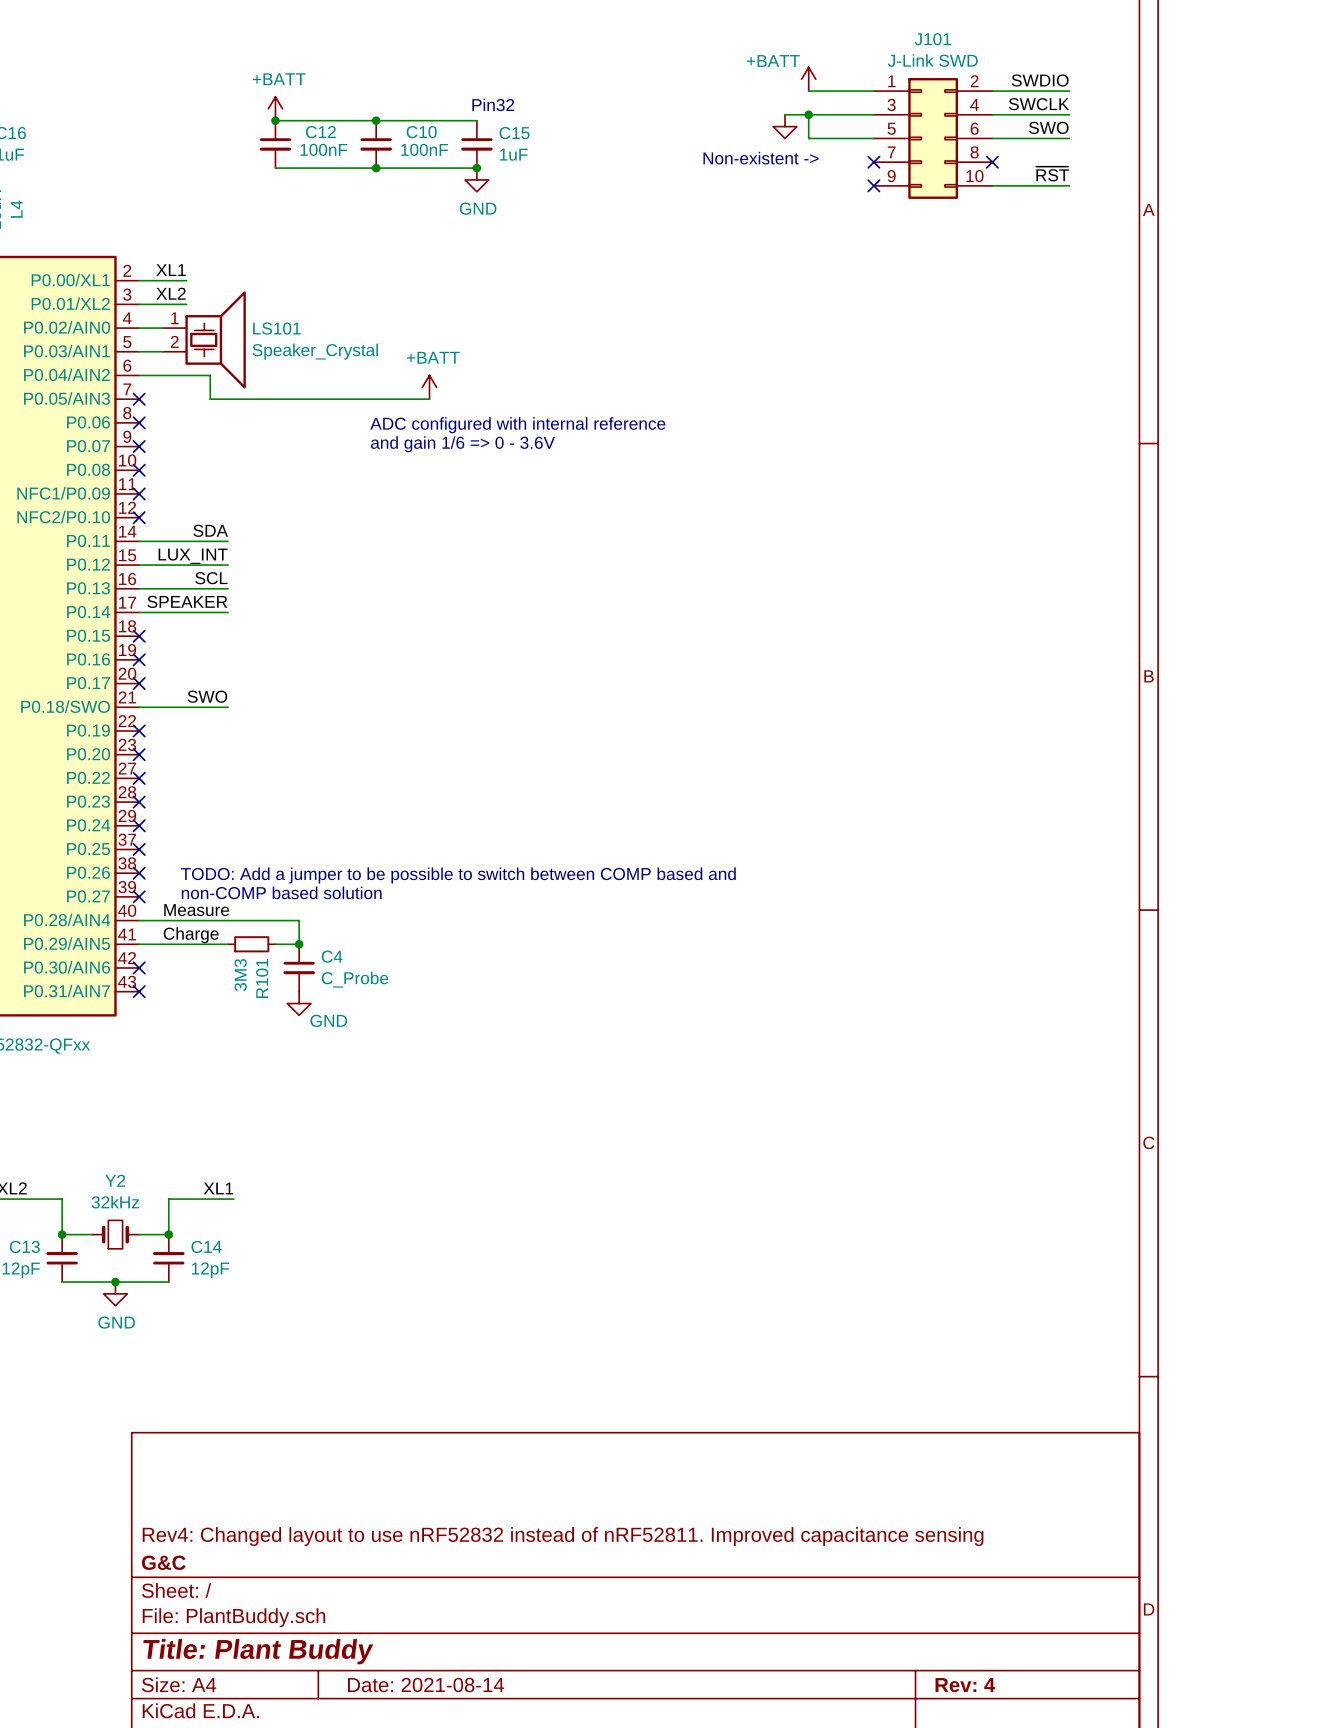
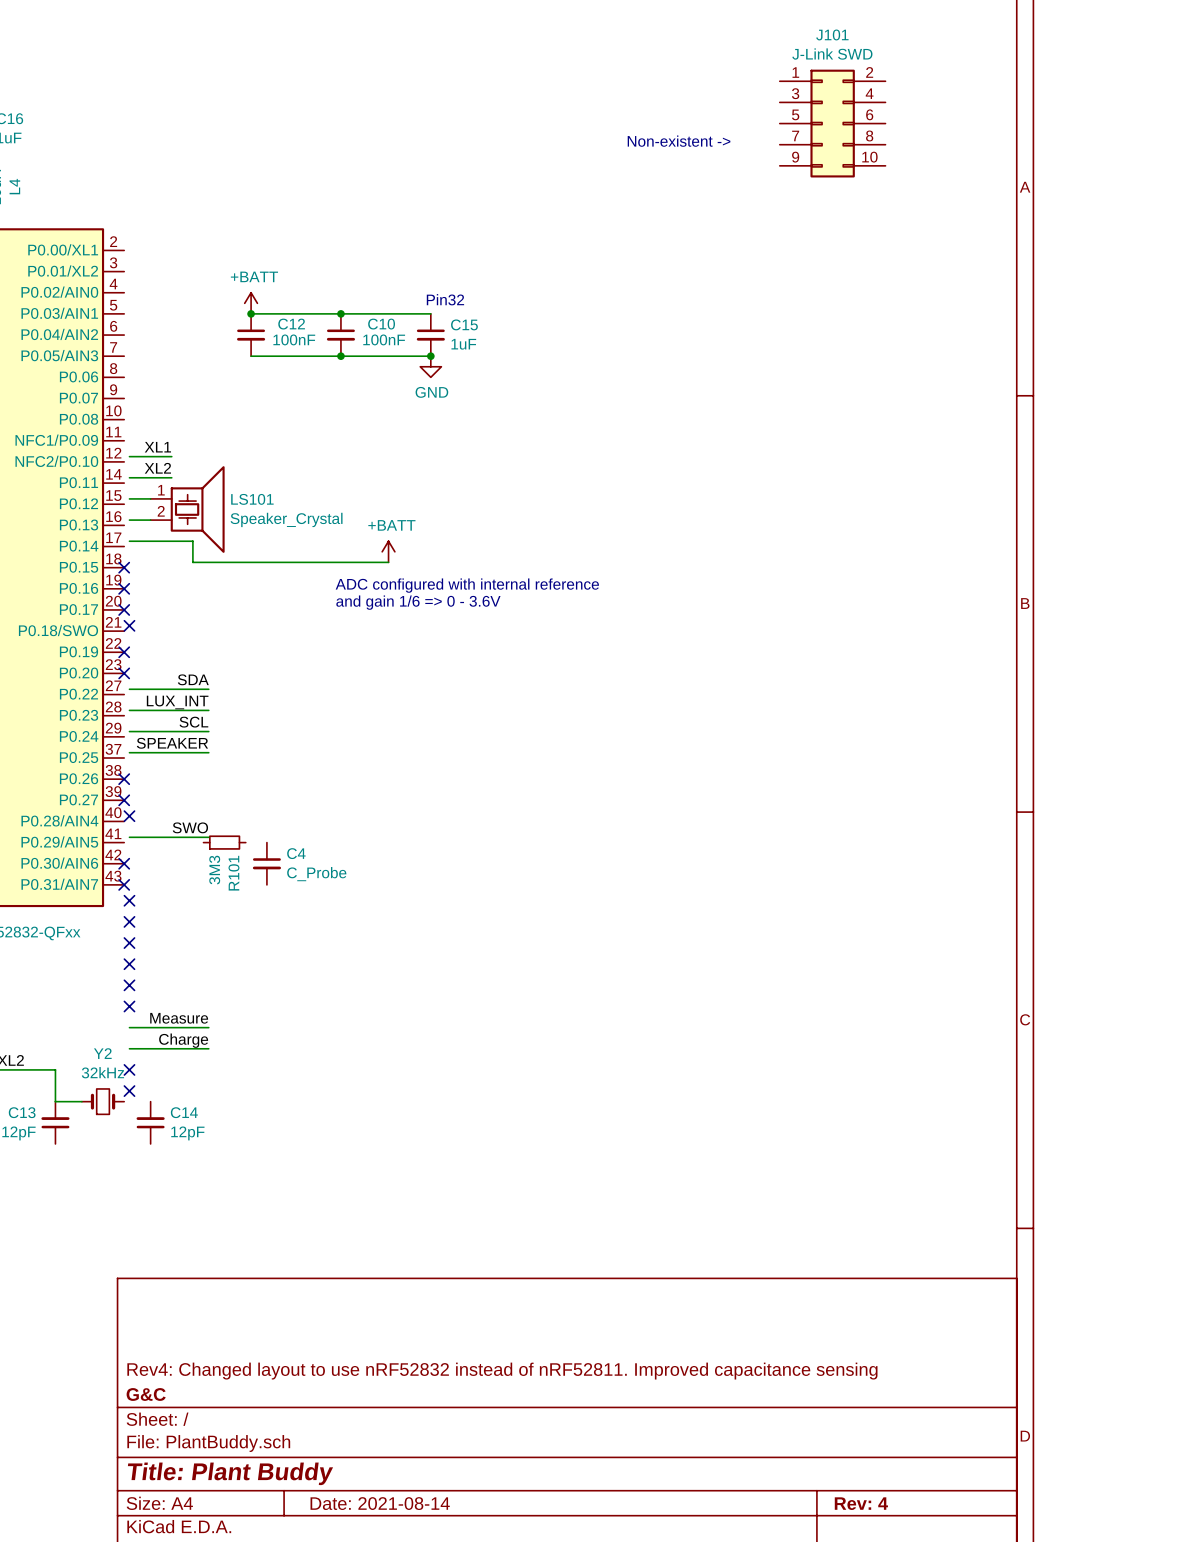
power symbol: +BATT (808, 79) -> none
label: SWDIO (1040, 80) -> none
wire: (808, 91) (873, 91) -> none
wire: (992, 91) (1069, 91) -> none
text position: Pin32 (493, 104) -> Pin32 (445, 299)
label: SWCLK (1039, 104) -> none
power symbol: +BATT (275, 108) -> none
wire: (785, 114) (873, 114) -> none
wire: (808, 114) (808, 138) (873, 138) -> none
junction: (808, 114) -> none
wire: (992, 114) (1069, 114) -> none
wire: (275, 120) (476, 120) -> (251, 313) (430, 313)
junction: (275, 120) -> none
junction: (376, 120) -> none
power symbol: (785, 126) -> none
label: SWO (1048, 127) -> none
wire: (992, 138) (1069, 138) -> none
C12 position: (275, 144) -> (251, 335)
C10 position: (376, 144) -> (340, 335)
C15 position: (476, 144) -> (430, 335)
no-connect mark: (873, 162) -> none
no-connect mark: (992, 162) -> none
wire: (275, 168) (476, 168) -> none
junction: (376, 168) -> none
junction: (476, 168) -> none
label: ~{RST} (1052, 174) -> none
power symbol position: GND (476, 179) -> GND (430, 366)
no-connect mark: (873, 185) -> none
wire: (992, 185) (1069, 185) -> none
label position: XL1 (171, 270) -> XL1 (157, 447)
wire: (139, 280) (186, 280) -> (129, 456) (171, 456)
label position: XL2 (171, 293) -> XL2 (157, 468)
wire: (139, 304) (186, 304) -> (129, 477) (171, 477)
wire: (139, 328) (162, 328) -> (129, 498) (150, 498)
LS101 position: (204, 339) -> (187, 509)
power symbol: none -> +BATT (251, 303)
wire: (139, 351) (162, 351) -> (129, 520) (150, 520)
junction: none -> (251, 313)
junction: none -> (340, 313)
wire: (139, 375) (210, 375) (210, 399) (281, 399) -> none
power symbol: +BATT (429, 387) -> none
no-connect mark: (139, 399) -> none
junction: none -> (340, 356)
wire: none -> (383, 356) (430, 356)
junction: none -> (430, 356)
no-connect mark: (139, 422) -> none
text position: ADC configured with internal reference (517, 425) -> ADC configured with internal reference (467, 585)
text position: and gain 1/6 => 0 - 3.6V (462, 444) -> and gain 1/6 => 0 - 3.6V (418, 602)
no-connect mark: (139, 446) -> none
no-connect mark: (139, 470) -> none
no-connect mark: (139, 493) -> none
no-connect mark: (139, 517) -> none
label position: SDA (210, 530) -> SDA (193, 679)
wire: (139, 541) (228, 541) -> (129, 689) (208, 689)
label position: LUX_INT (193, 556) -> LUX_INT (177, 702)
wire: (139, 565) (228, 565) -> (129, 710) (208, 710)
label position: SCL (211, 578) -> SCL (193, 722)
wire: (139, 588) (228, 588) -> (129, 731) (208, 731)
label position: SPEAKER (187, 601) -> SPEAKER (172, 743)
wire: none -> (129, 541) (192, 541) (192, 562) (388, 562)
wire: (139, 612) (228, 612) -> (129, 752) (208, 752)
power symbol: none -> +BATT (388, 551)
label position: SWO (207, 696) -> SWO (190, 827)
no-connect mark: none -> (129, 625)
wire: (139, 707) (228, 707) -> (129, 837) (208, 837)
no-connect mark: (139, 778) -> none
no-connect mark: (139, 802) -> none
no-connect mark: (139, 825) -> none
no-connect mark: (139, 849) -> none
text: TODO: Add a jumper to be possible to switch between COMP based and (458, 875) -> none
text: non-COMP based solution (281, 892) -> none
label: Measure (196, 910) -> none
no-connect mark: none -> (129, 816)
wire: (139, 920) (299, 920) (299, 944) (275, 944) -> none
label: Charge (191, 935) -> none
wire: (139, 944) (228, 944) -> (129, 1048) (208, 1048)
junction: (299, 944) -> none
power symbol: GND (299, 1003) -> none
no-connect mark: none -> (129, 900)
no-connect mark: none -> (129, 921)
no-connect mark: none -> (129, 943)
no-connect mark: none -> (129, 964)
no-connect mark: none -> (129, 985)
no-connect mark: none -> (129, 1006)
label: none -> Measure (179, 1018)
wire: none -> (129, 1027) (208, 1027)
label: none -> Charge (183, 1040)
label: XL1 (218, 1188) -> none
no-connect mark: none -> (129, 1069)
wire: (233, 1199) (168, 1199) (168, 1234) (139, 1234) -> none
no-connect mark: none -> (129, 1091)
junction: (62, 1234) -> none
junction: (168, 1234) -> none
wire: (62, 1282) (168, 1282) -> none
junction: (115, 1282) -> none
power symbol: GND (115, 1293) -> none

